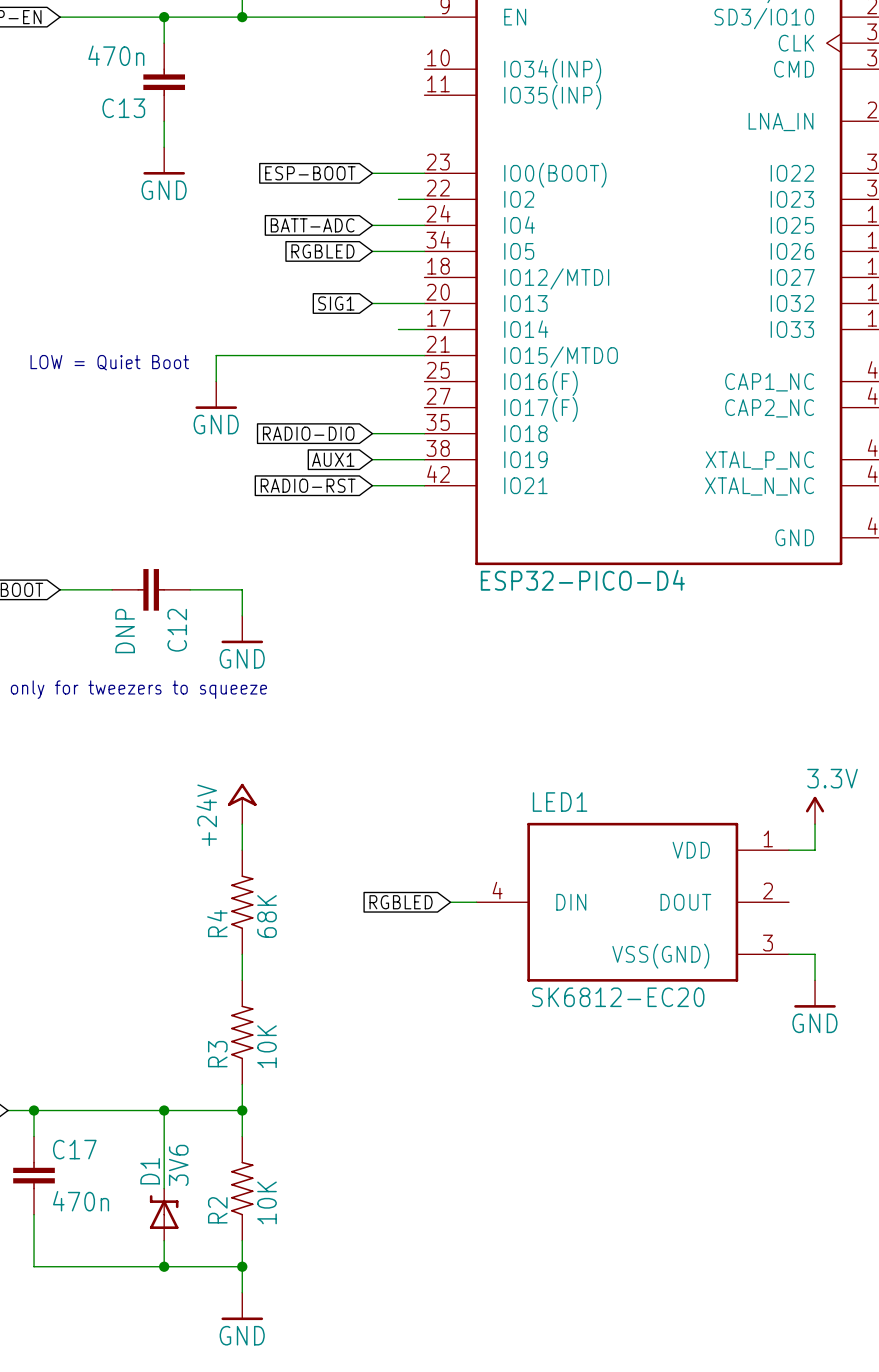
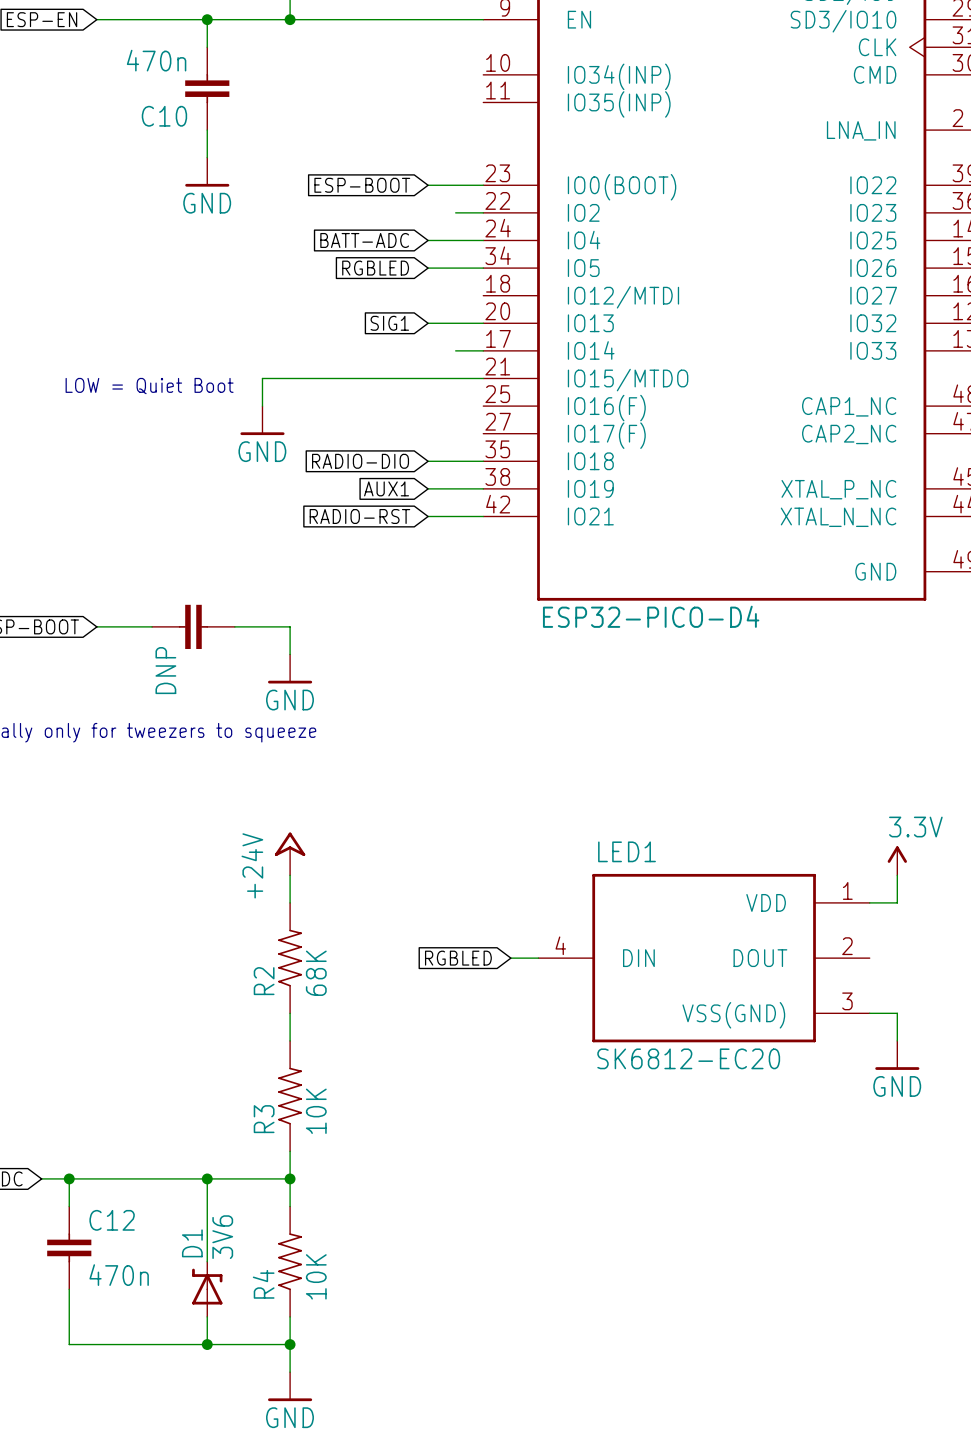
C13 name: C13 (123, 108) -> C10 (164, 116)
C12 name: C12 (177, 630) -> none
R4 name: R4 (217, 923) -> R2 (264, 981)
C17 name: C17 (74, 1149) -> C12 (112, 1220)
R2 name: R2 (217, 1210) -> R4 (263, 1284)

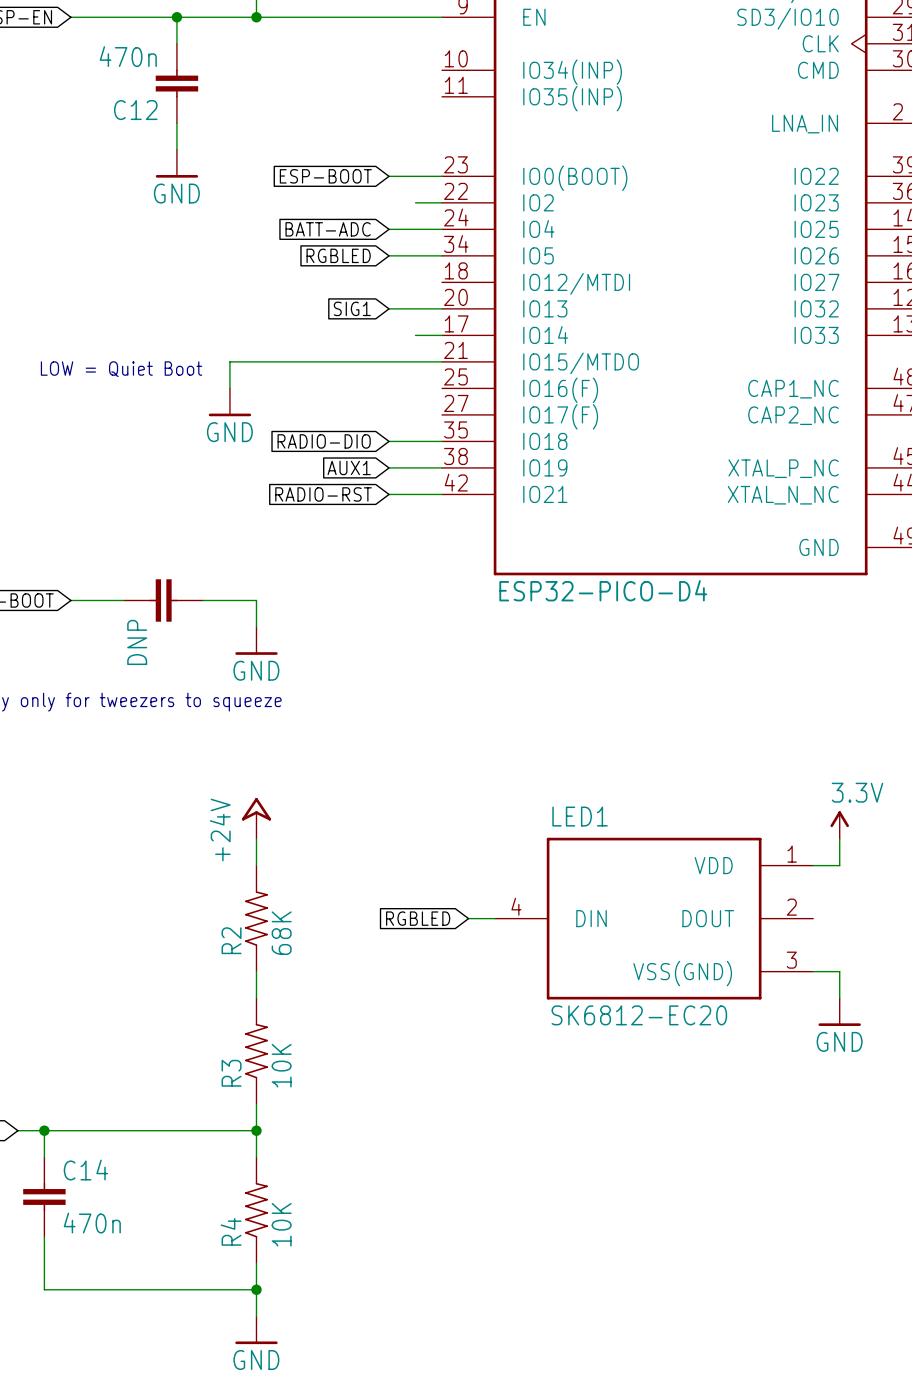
C10 name: C10 (164, 116) -> C12 (135, 110)
wire: (207, 1178) (207, 1261) -> none
junction: (207, 1178) -> none
C12 name: C12 (112, 1220) -> C14 (85, 1170)
D1: 3V6 (207, 1289) -> none
wire: (207, 1316) (207, 1344) -> none
junction: (207, 1344) -> none

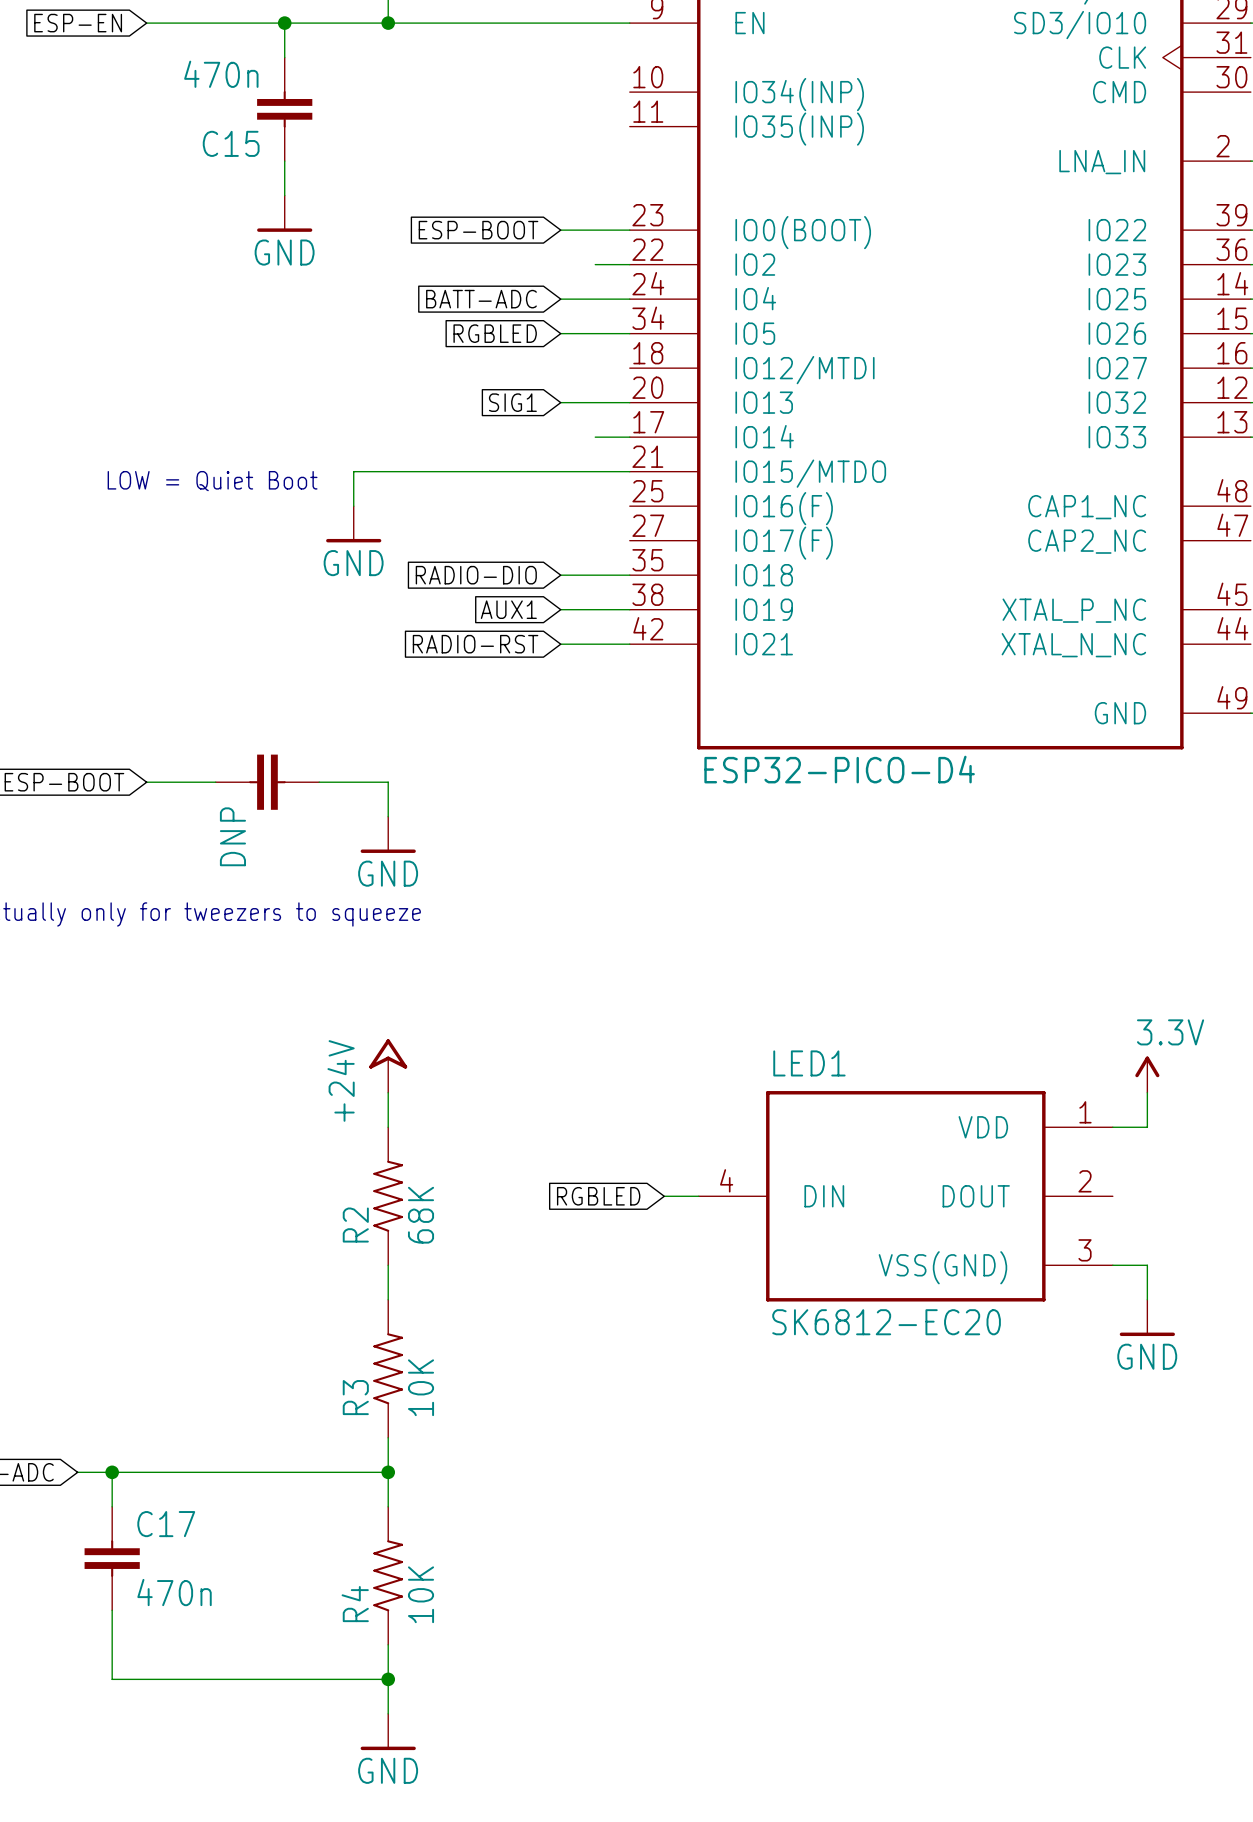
C12 name: C12 (135, 110) -> C15 (231, 143)
C14 name: C14 (85, 1170) -> C17 (166, 1524)

